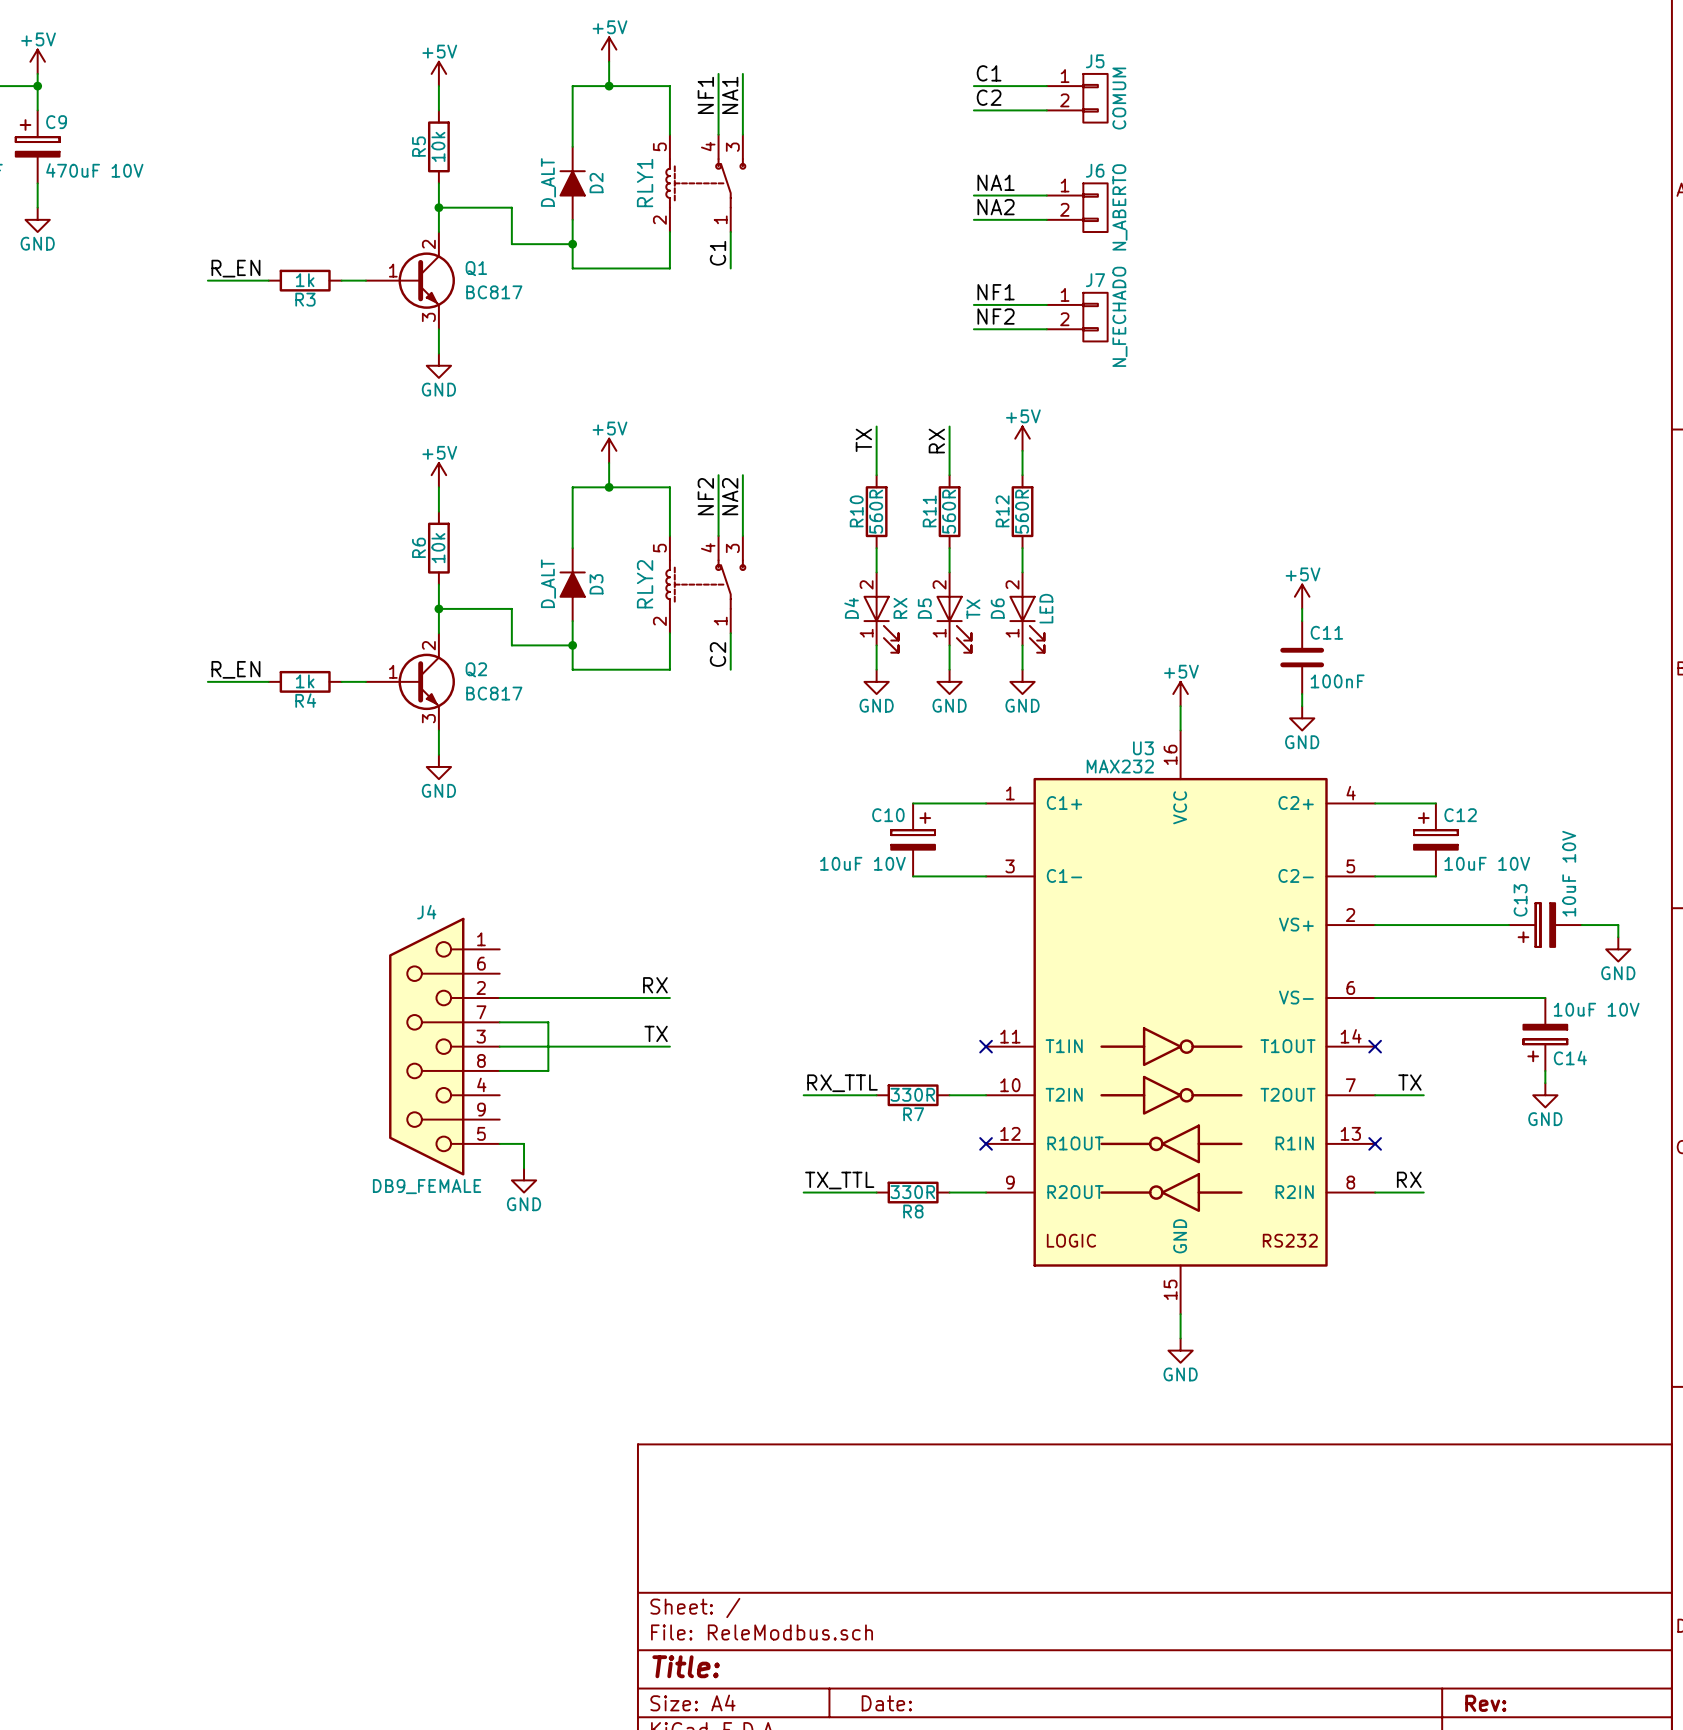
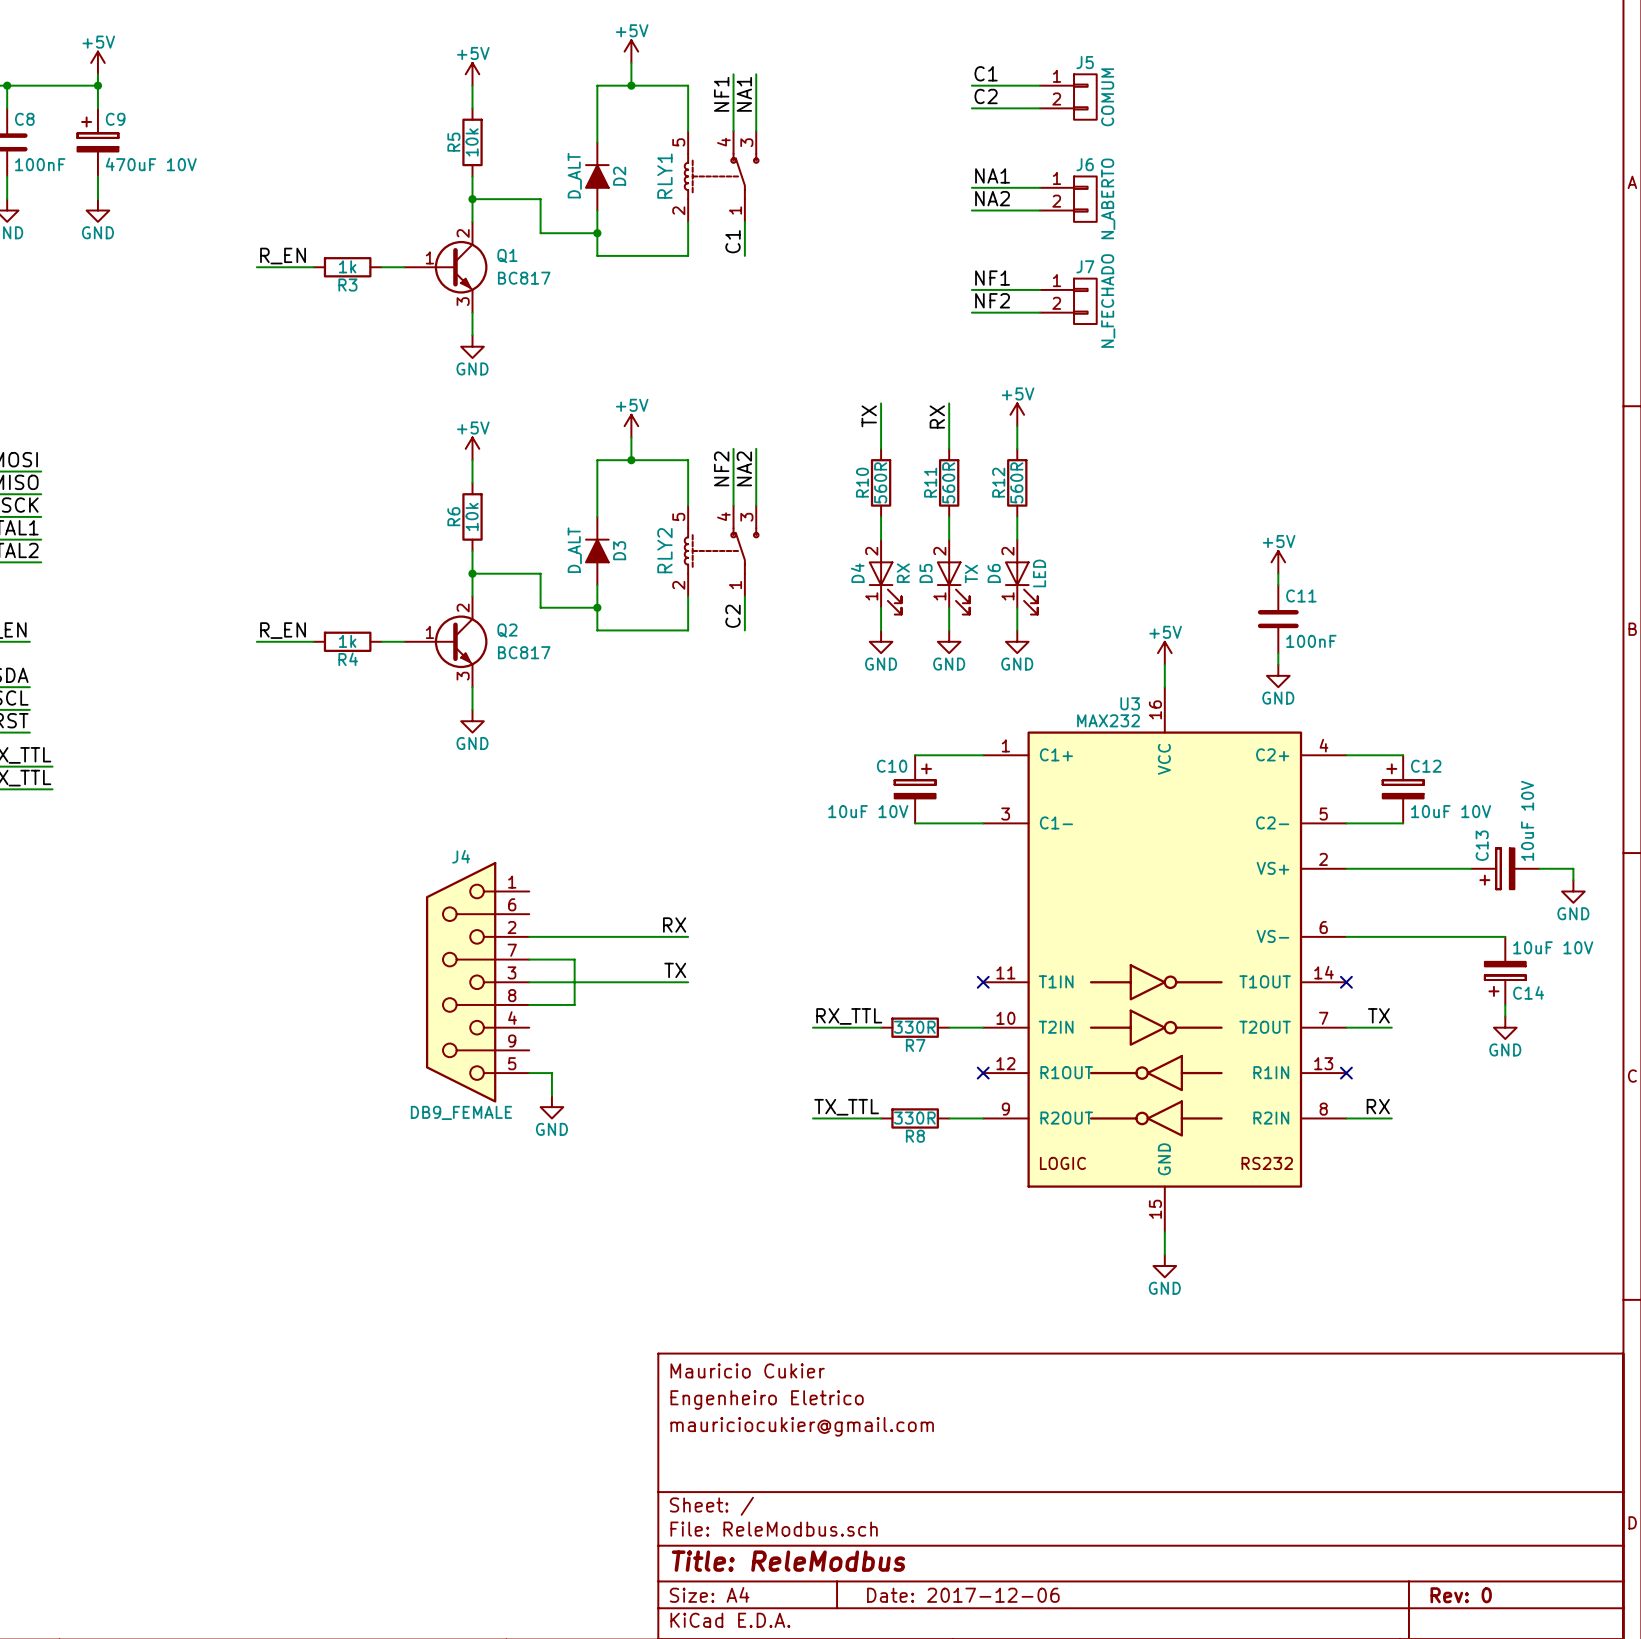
title block: none -> Mauricio Cukier (747, 1370)
title block: none -> Engenheiro Eletrico (767, 1399)
title block: none -> mauriciocukier@gmail.com (802, 1426)
title block: Title: (686, 1666) -> Title: ReleModbus (788, 1561)
title block: Date: (886, 1703) -> Date: 2017-12-06 (963, 1595)
title block: Rev: (1485, 1703) -> Rev: 0 (1461, 1595)

